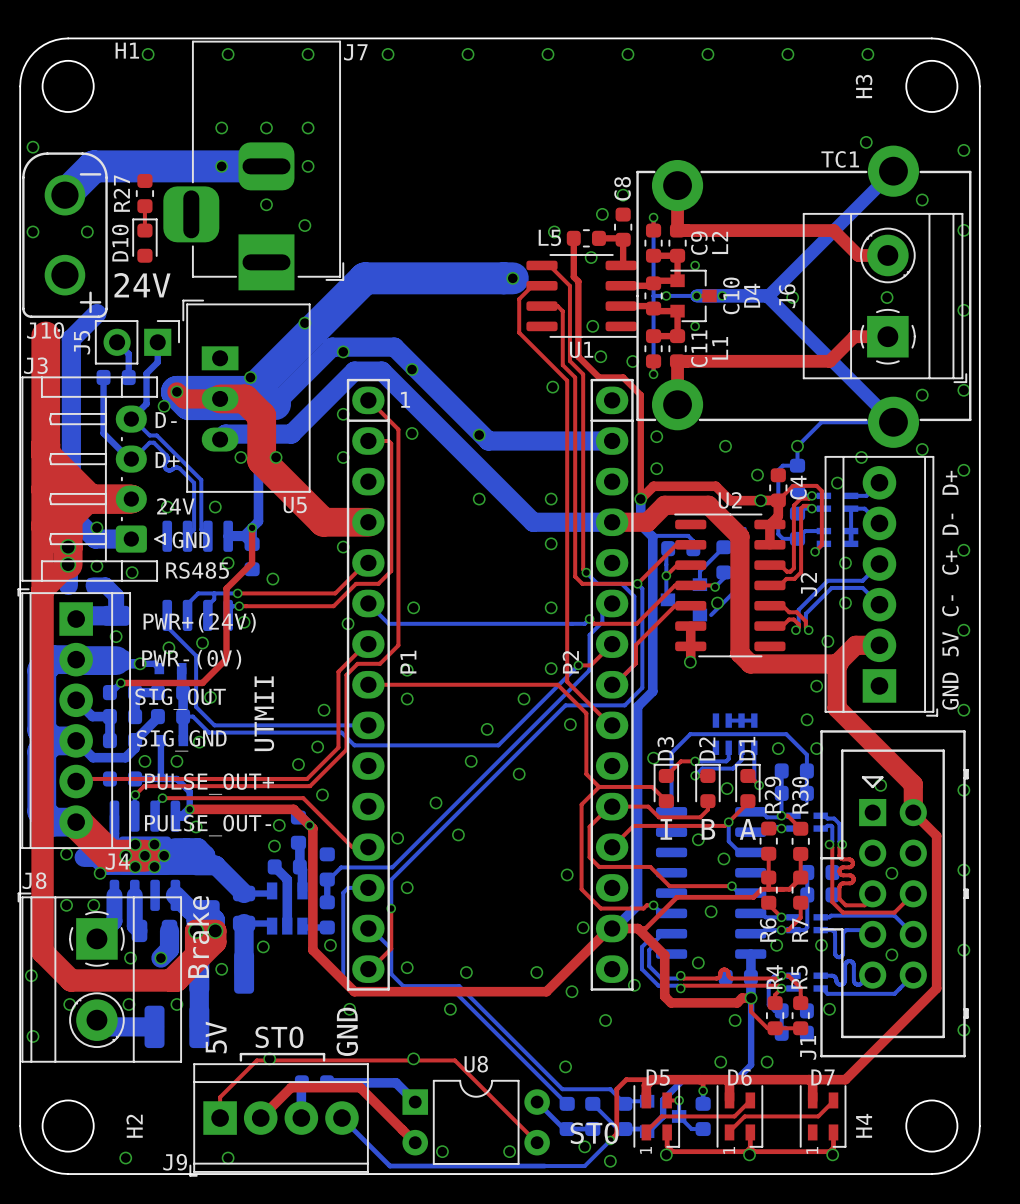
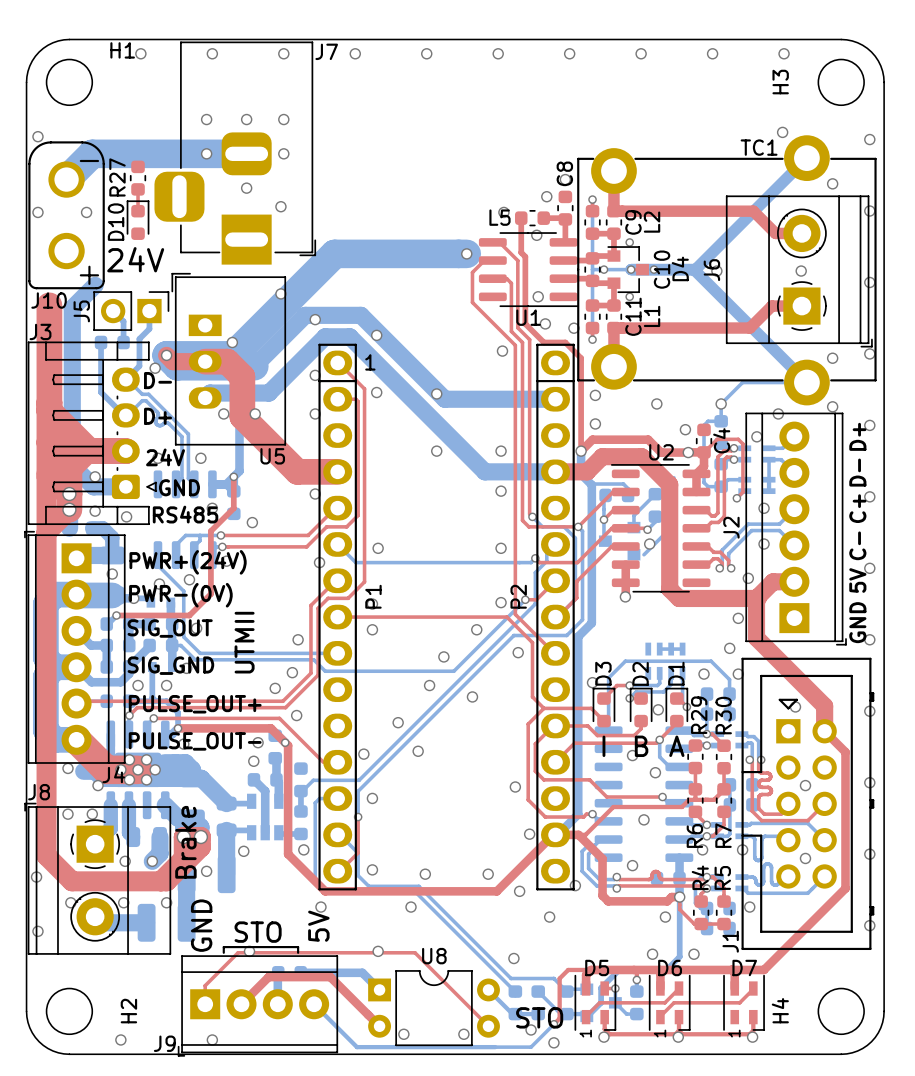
text: GND (347, 1031) -> 5V (318, 926)
text: 5V (216, 1037) -> GND (201, 925)

